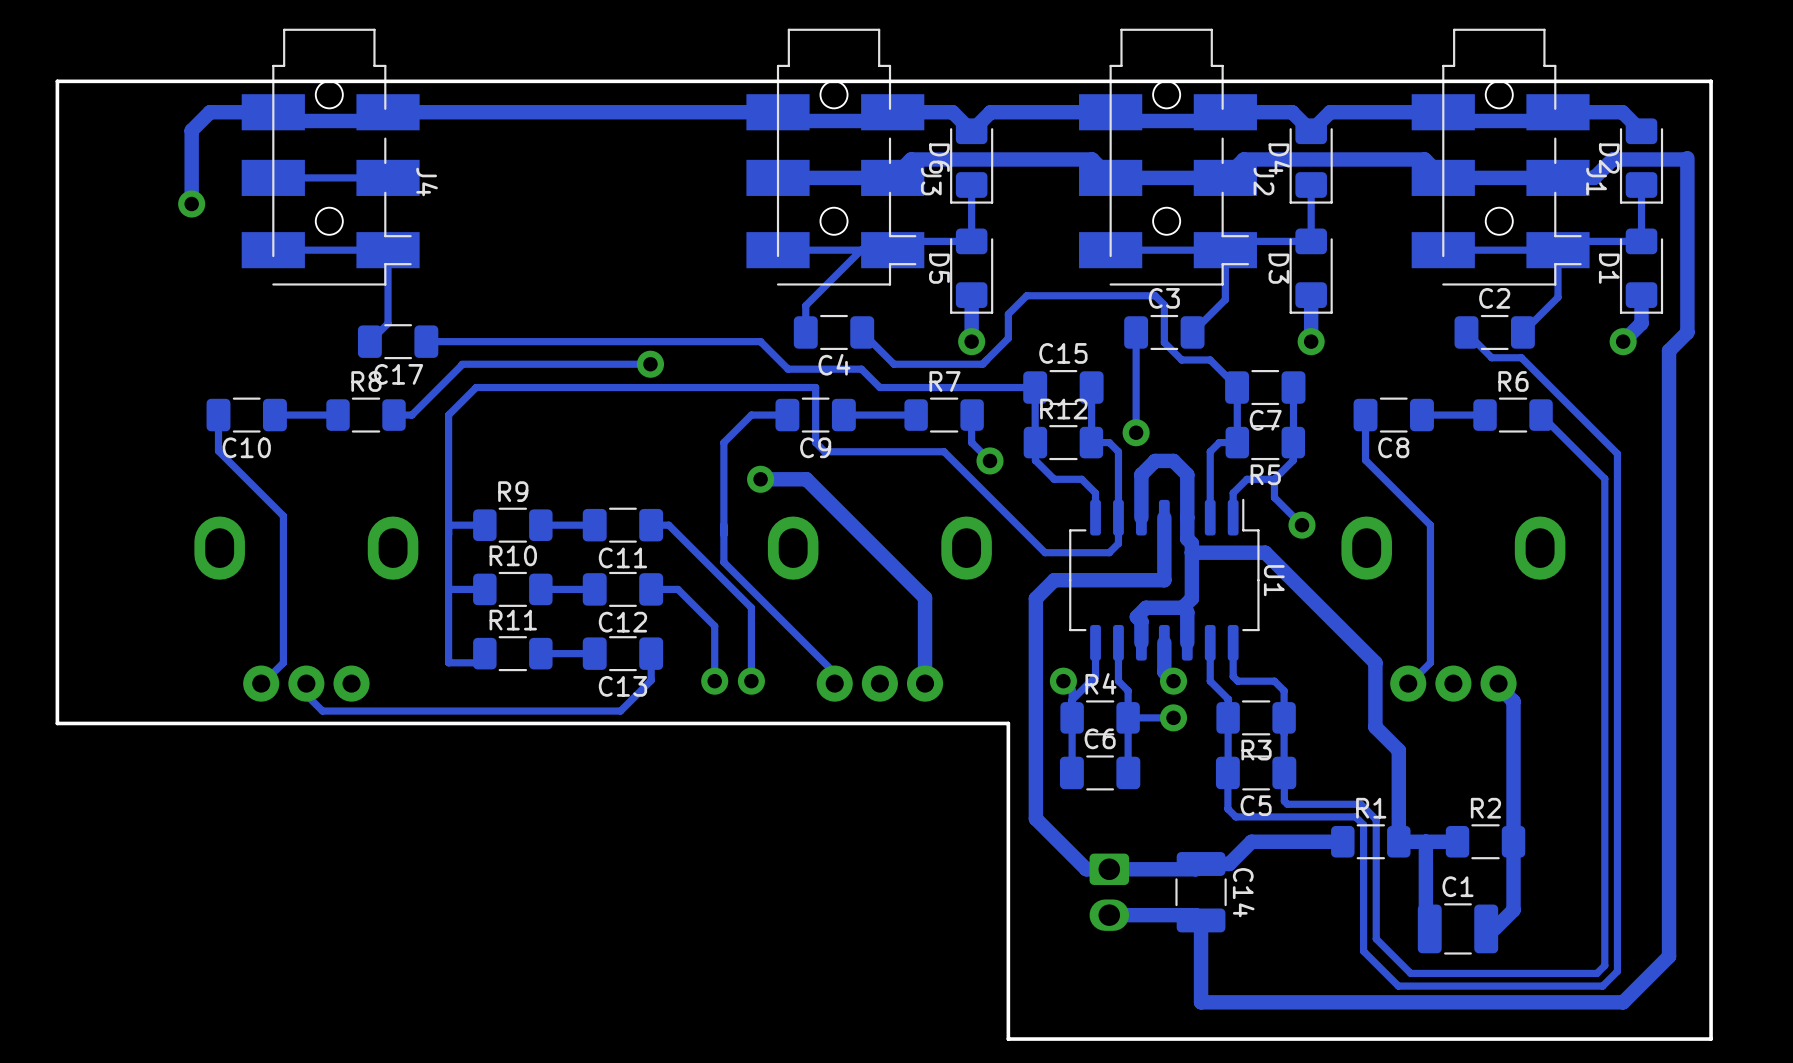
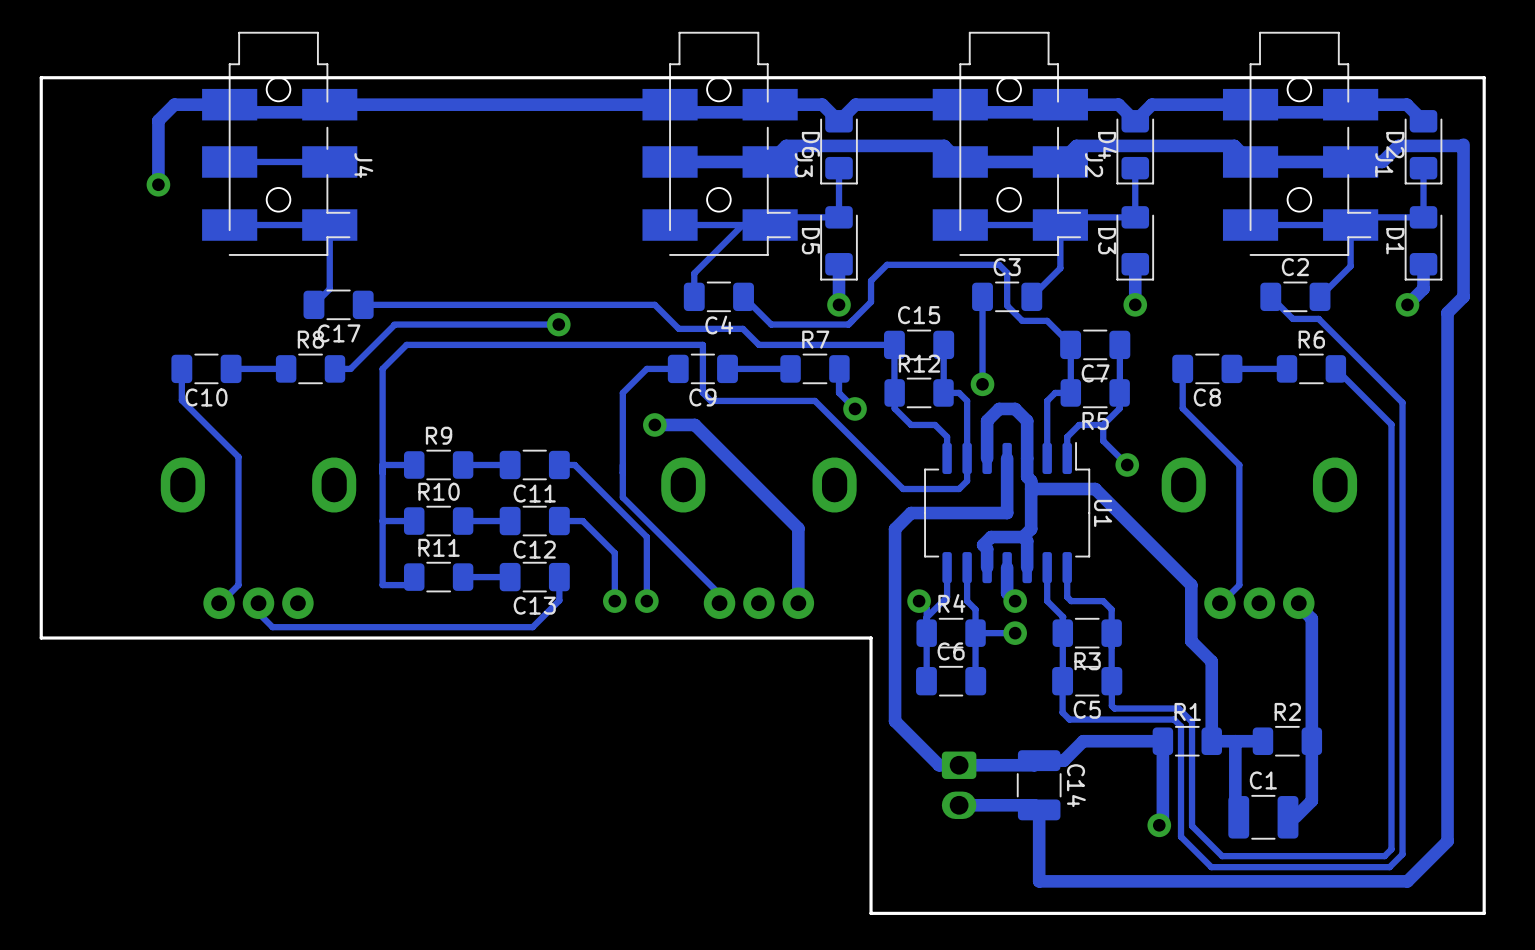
track: none -> (1162, 741) (1162, 821) (1159, 825)
via: none -> (1159, 825)

